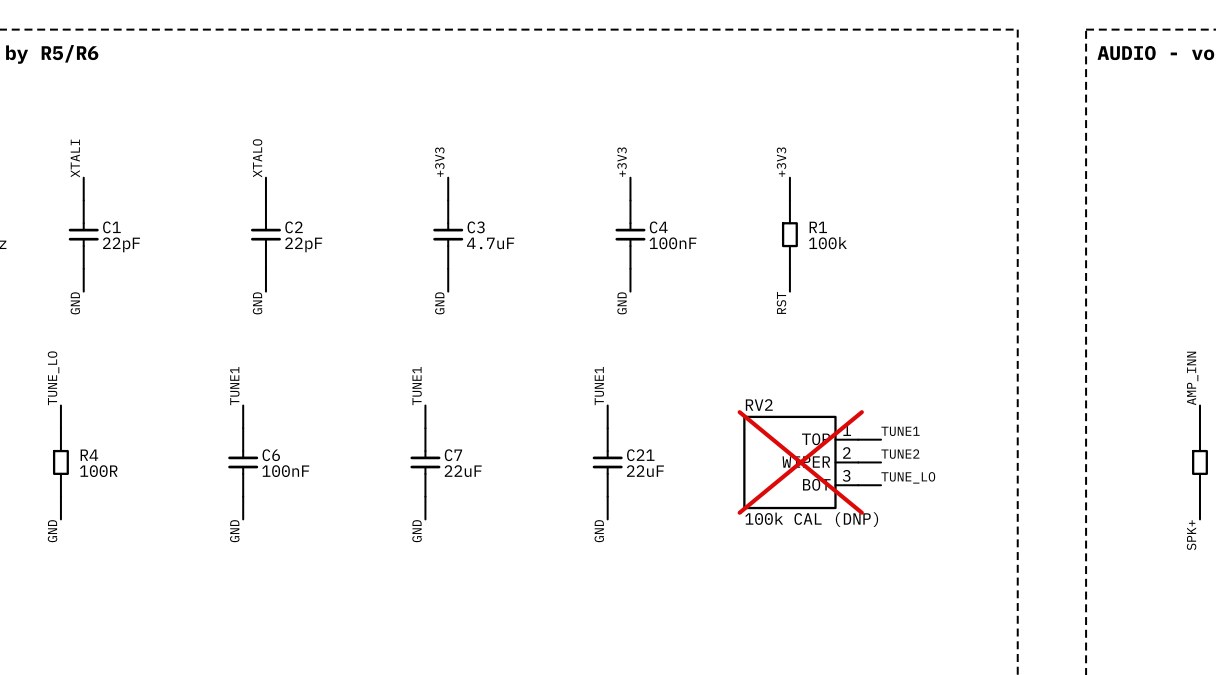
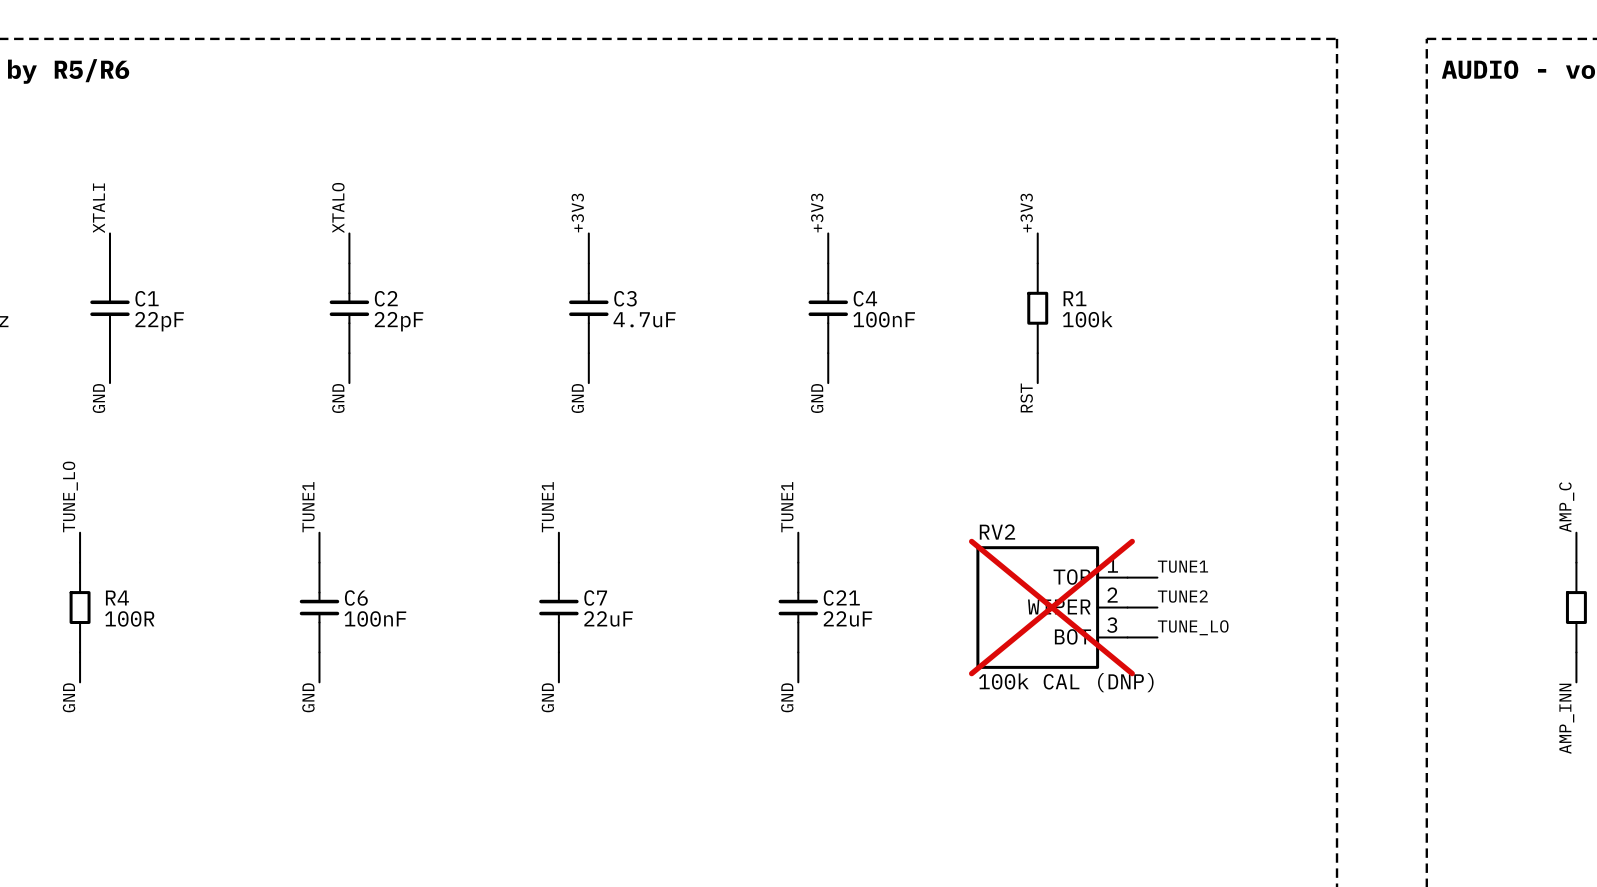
label: AMP_INN (1192, 378) -> AMP_C (1566, 507)
label: SPK+ (1191, 535) -> AMP_INN (1566, 718)

